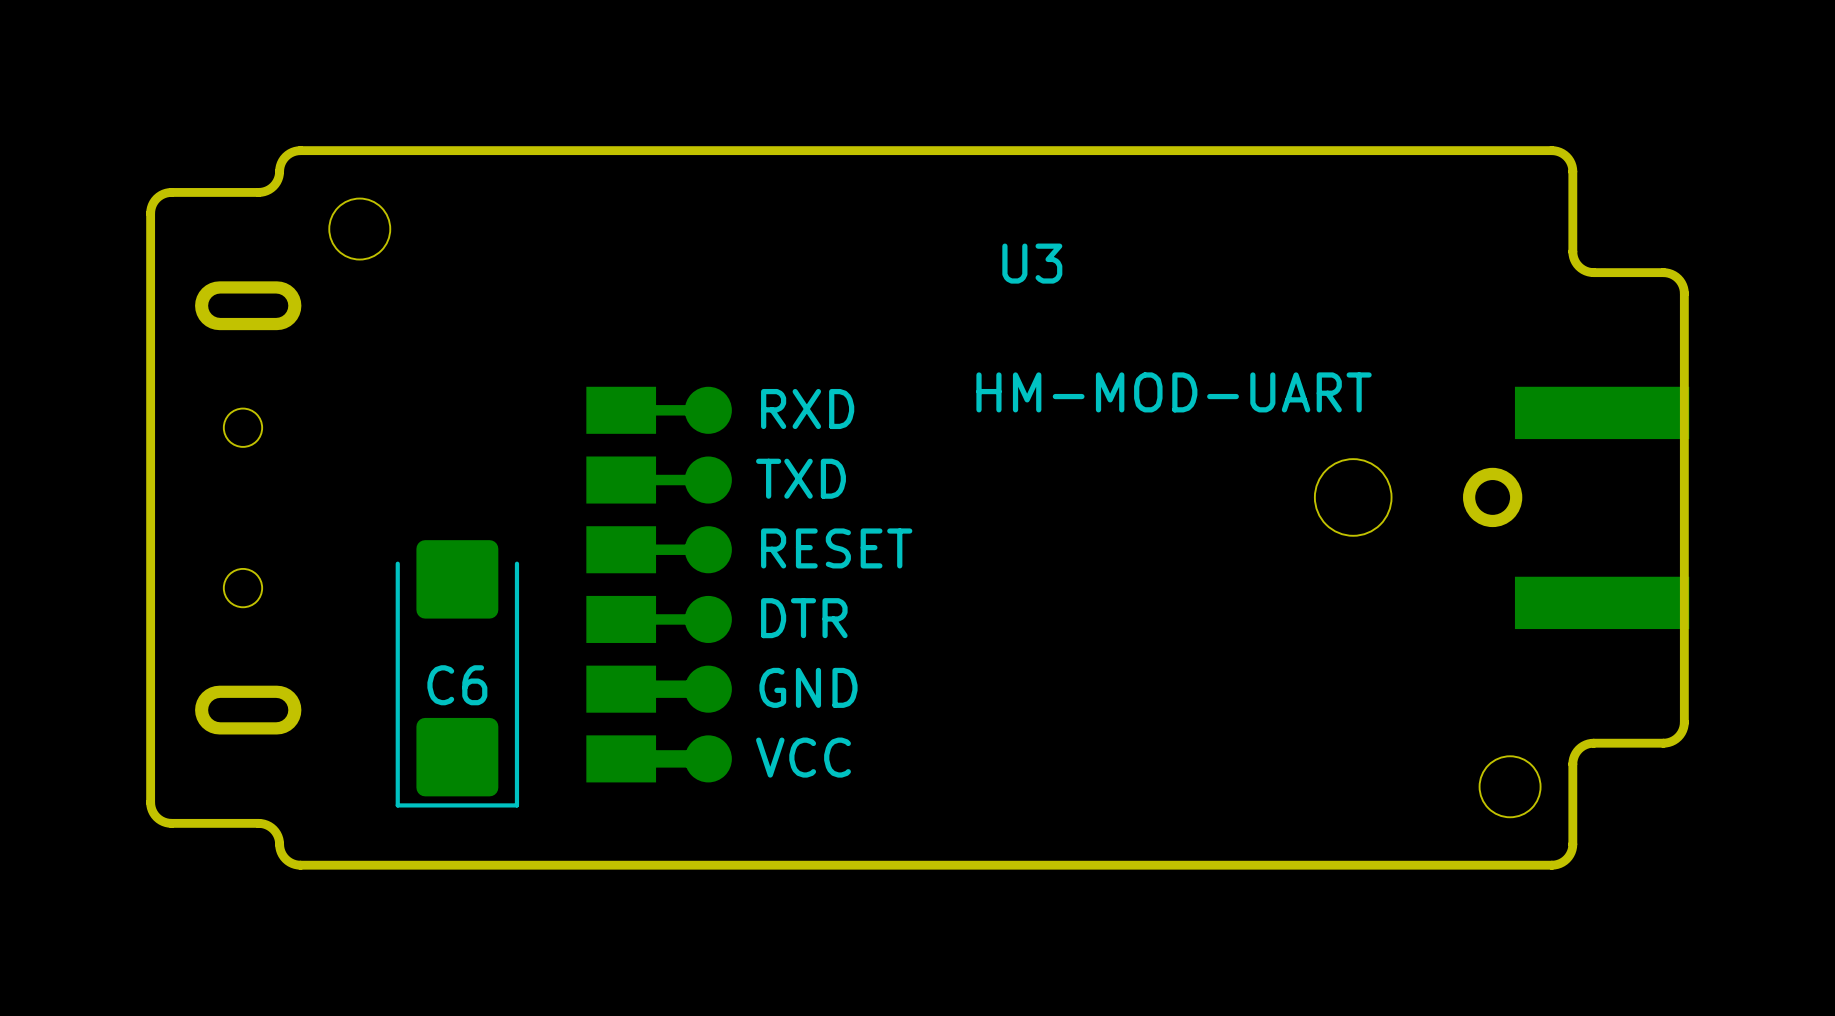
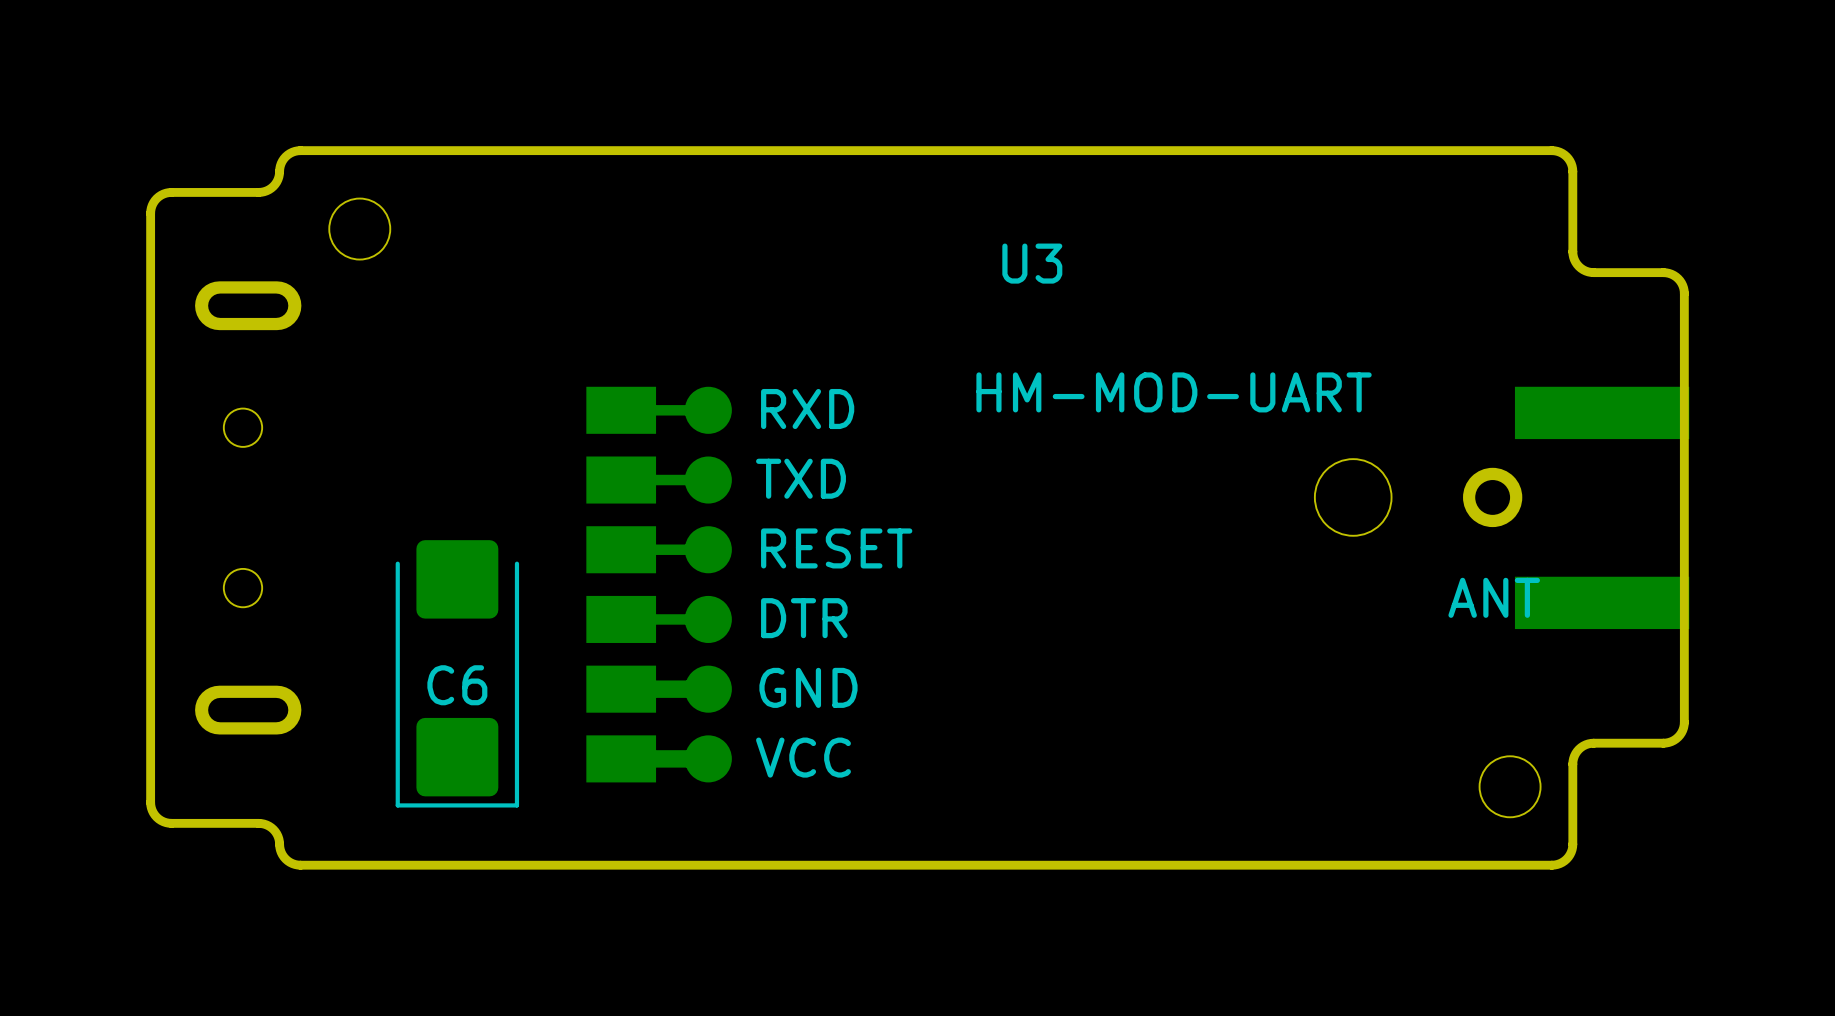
U3 text: none -> ANT (1494, 597)

